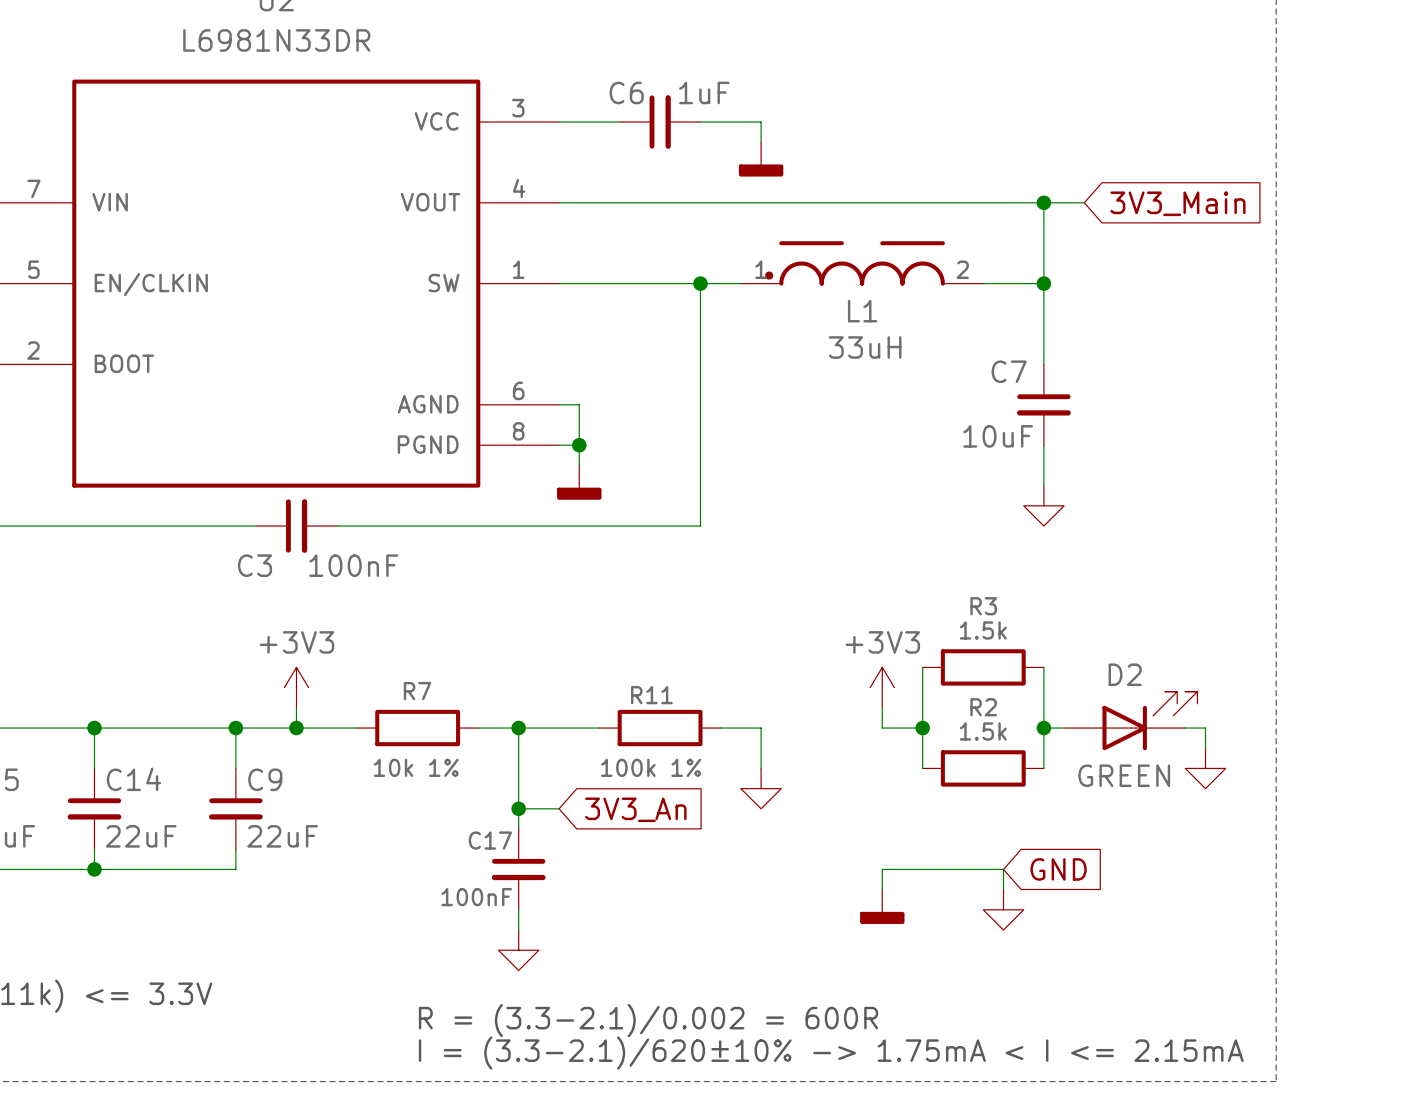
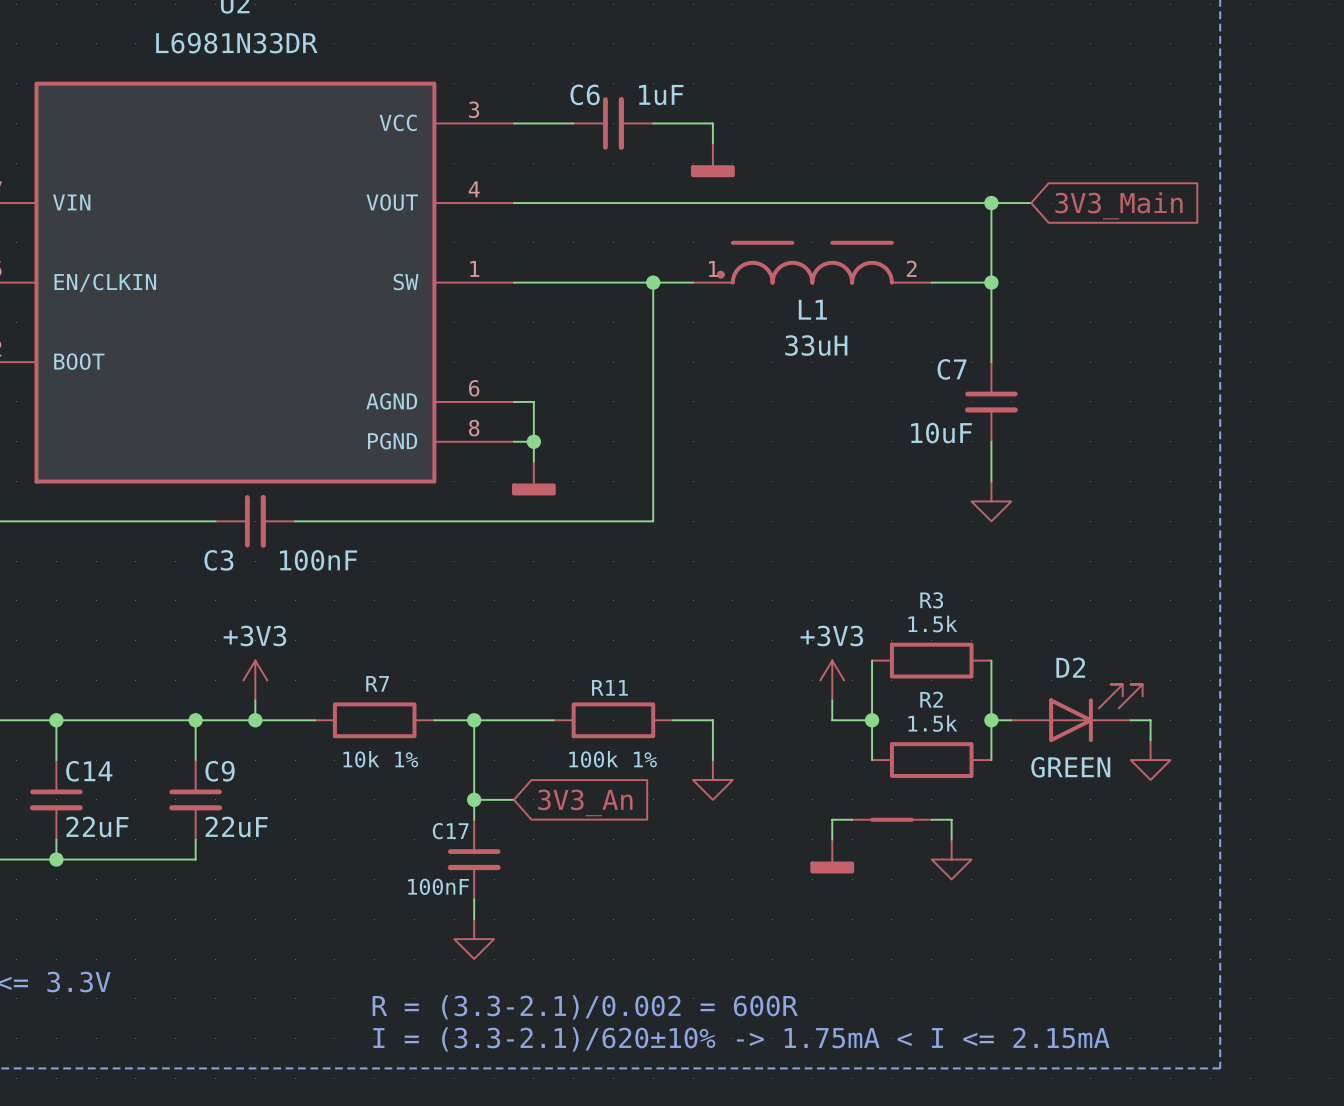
wire: none -> (852, 819) (832, 819) (832, 839)
part: none -> (891, 819)
wire: none -> (931, 819) (951, 819) (951, 839)
global label: GND (1058, 869) -> none
wire: (882, 889) (882, 869) (1003, 869) (1003, 889) -> none
power symbol position: (882, 906) -> (832, 856)
power symbol position: (1003, 909) -> (951, 859)

